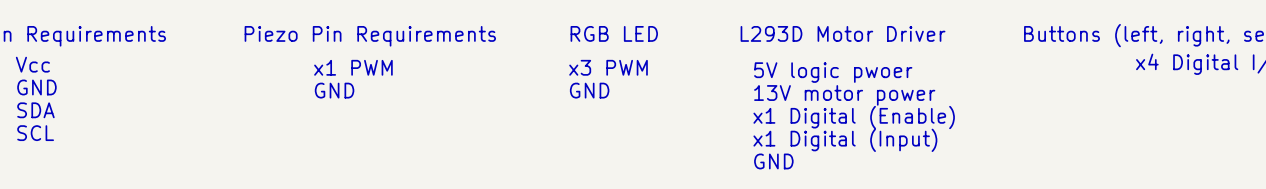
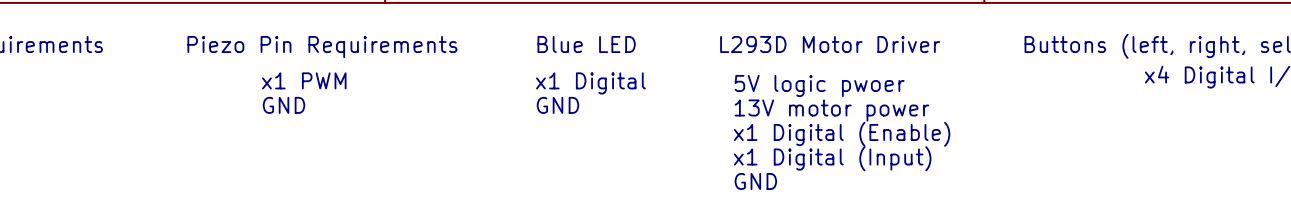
text: RGB LED (614, 33) -> Blue LED (586, 44)
text: x3 PWM (608, 67) -> x1 Digital (590, 83)

